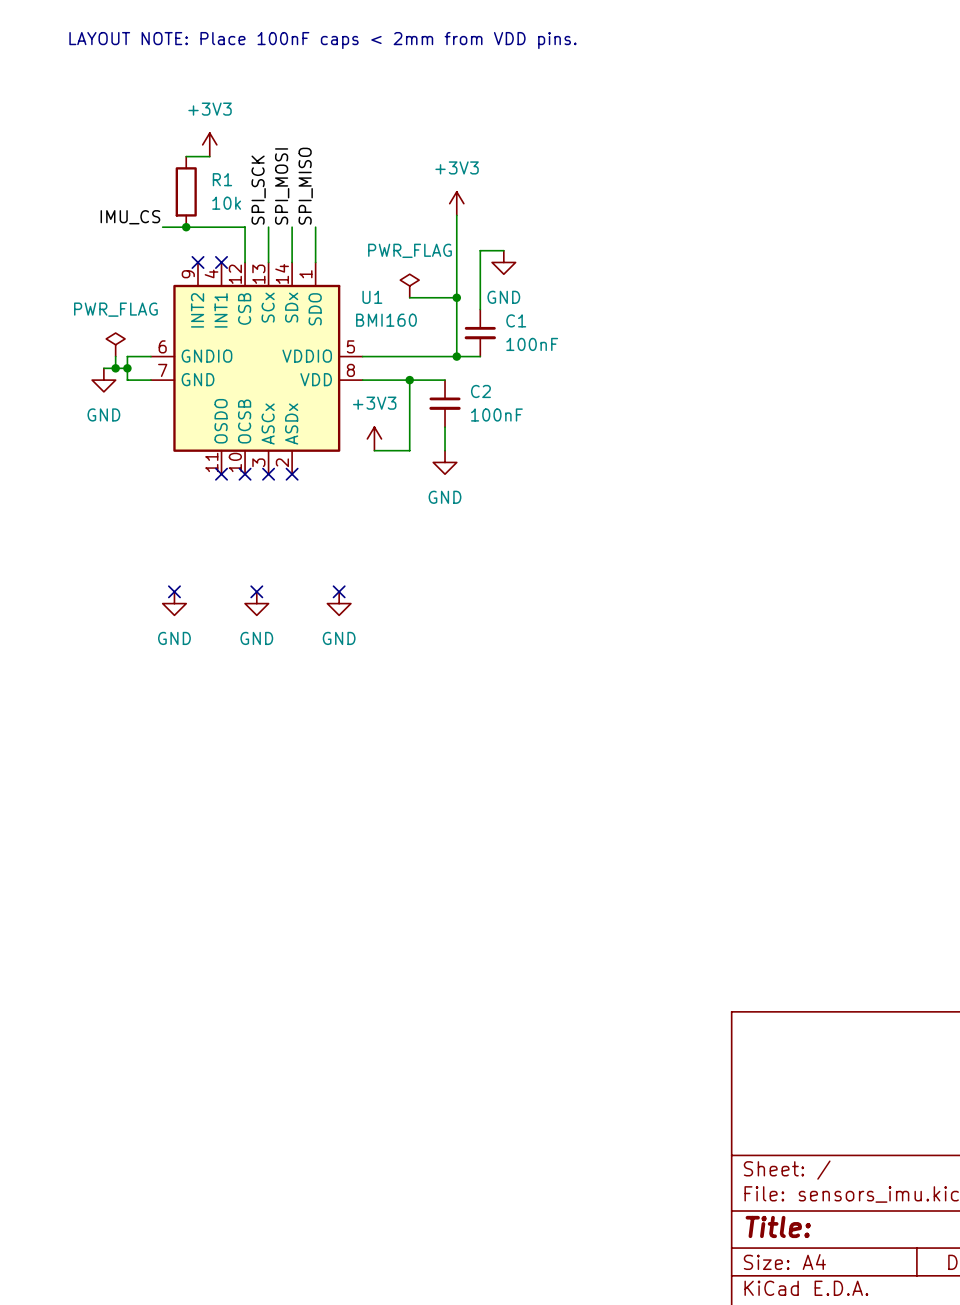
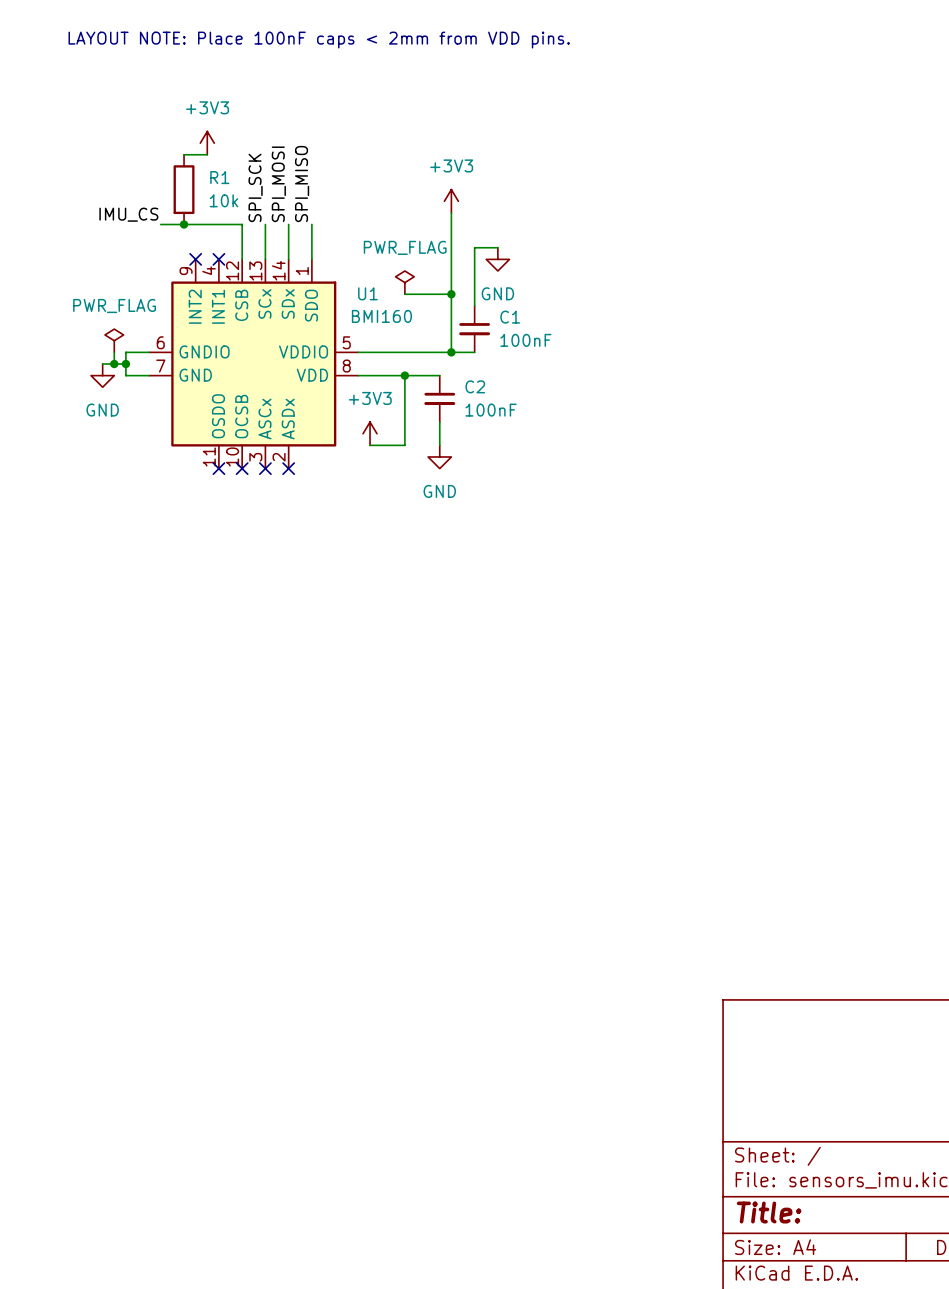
no-connect mark: (174, 591) -> none
no-connect mark: (256, 591) -> none
no-connect mark: (339, 591) -> none
power symbol: GND (174, 603) -> none
power symbol: GND (256, 603) -> none
power symbol: GND (339, 603) -> none

